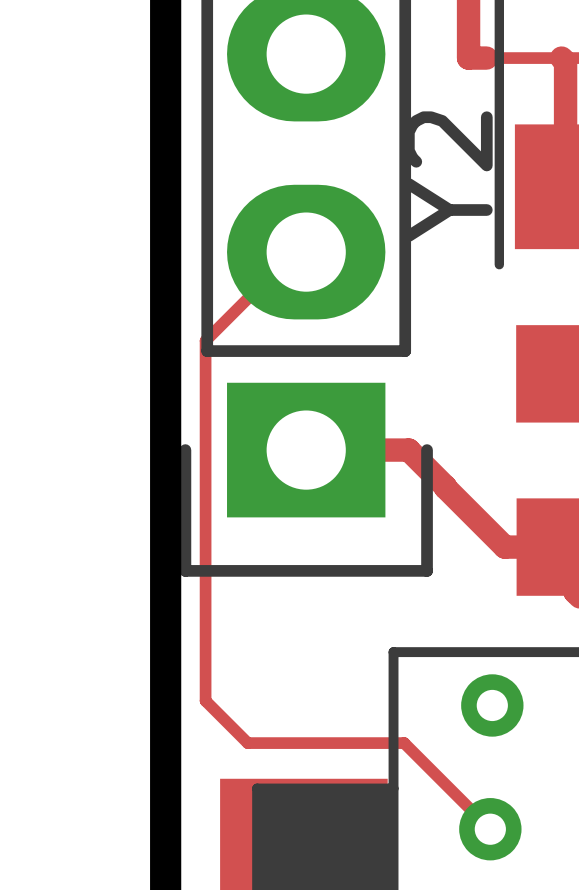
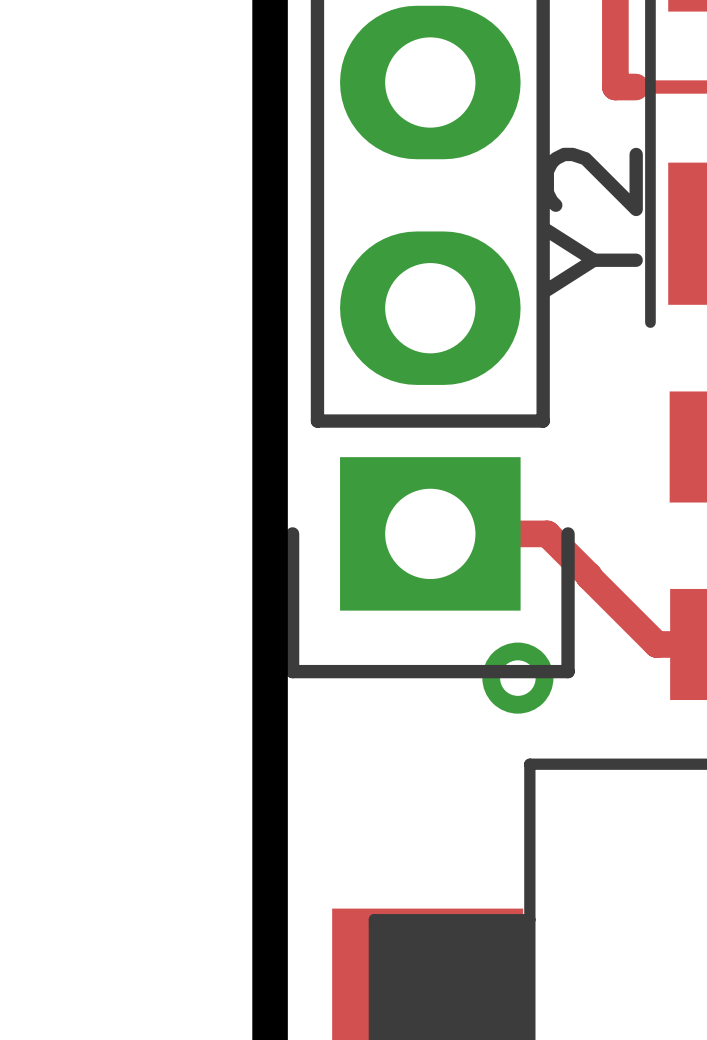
track: (306, 252) (294, 252) (205, 340) (205, 700) (247, 743) (404, 743) (490, 829) -> none
via: none -> (517, 678)
via: (492, 705) -> none
via: (490, 829) -> none

